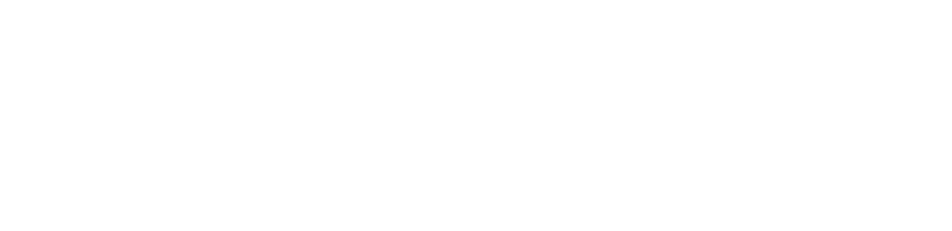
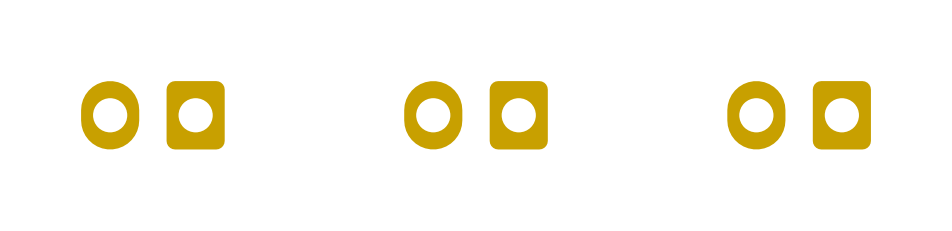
part: none -> (152, 115)
part: none -> (476, 115)
part: none -> (799, 115)

